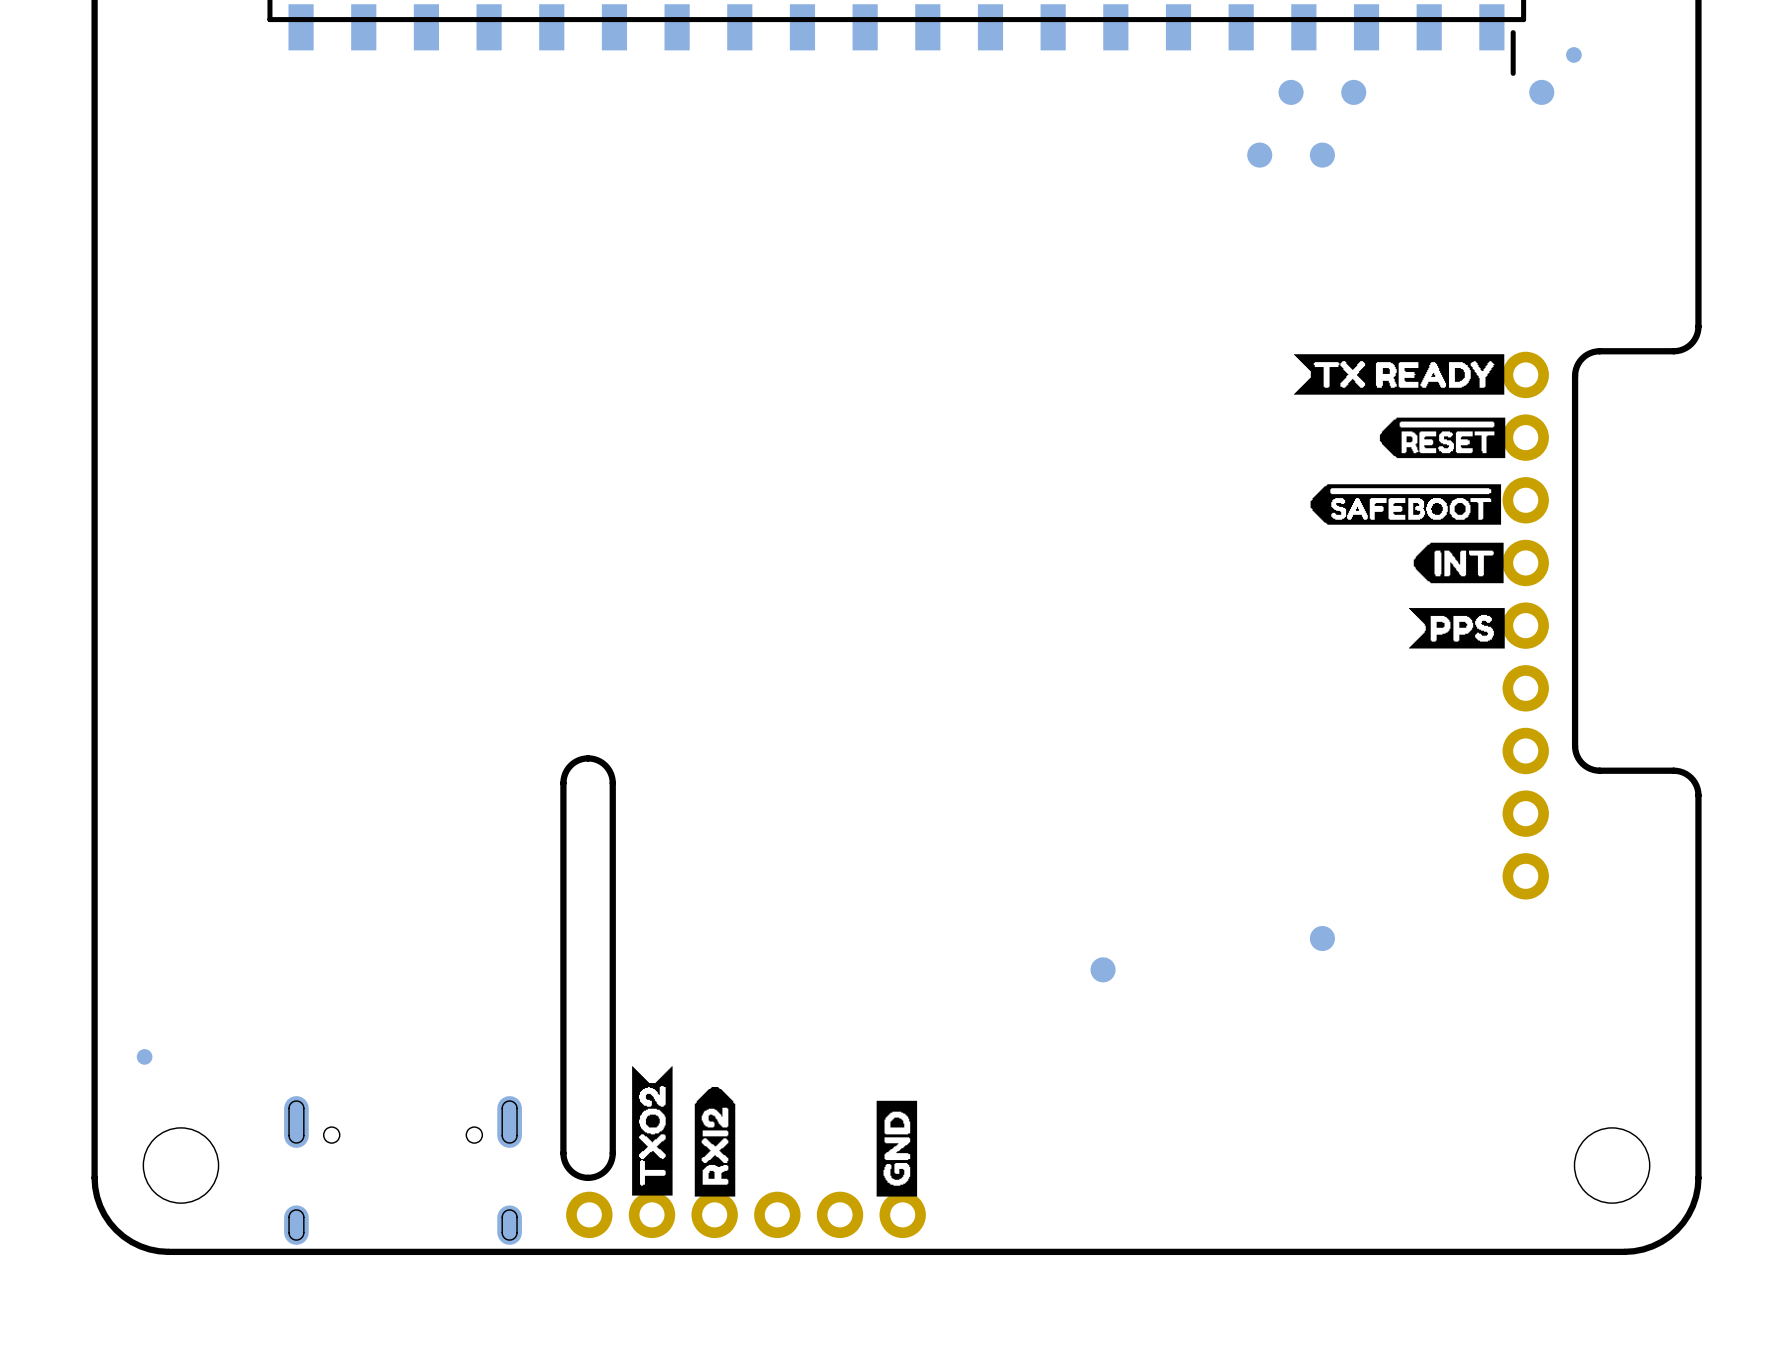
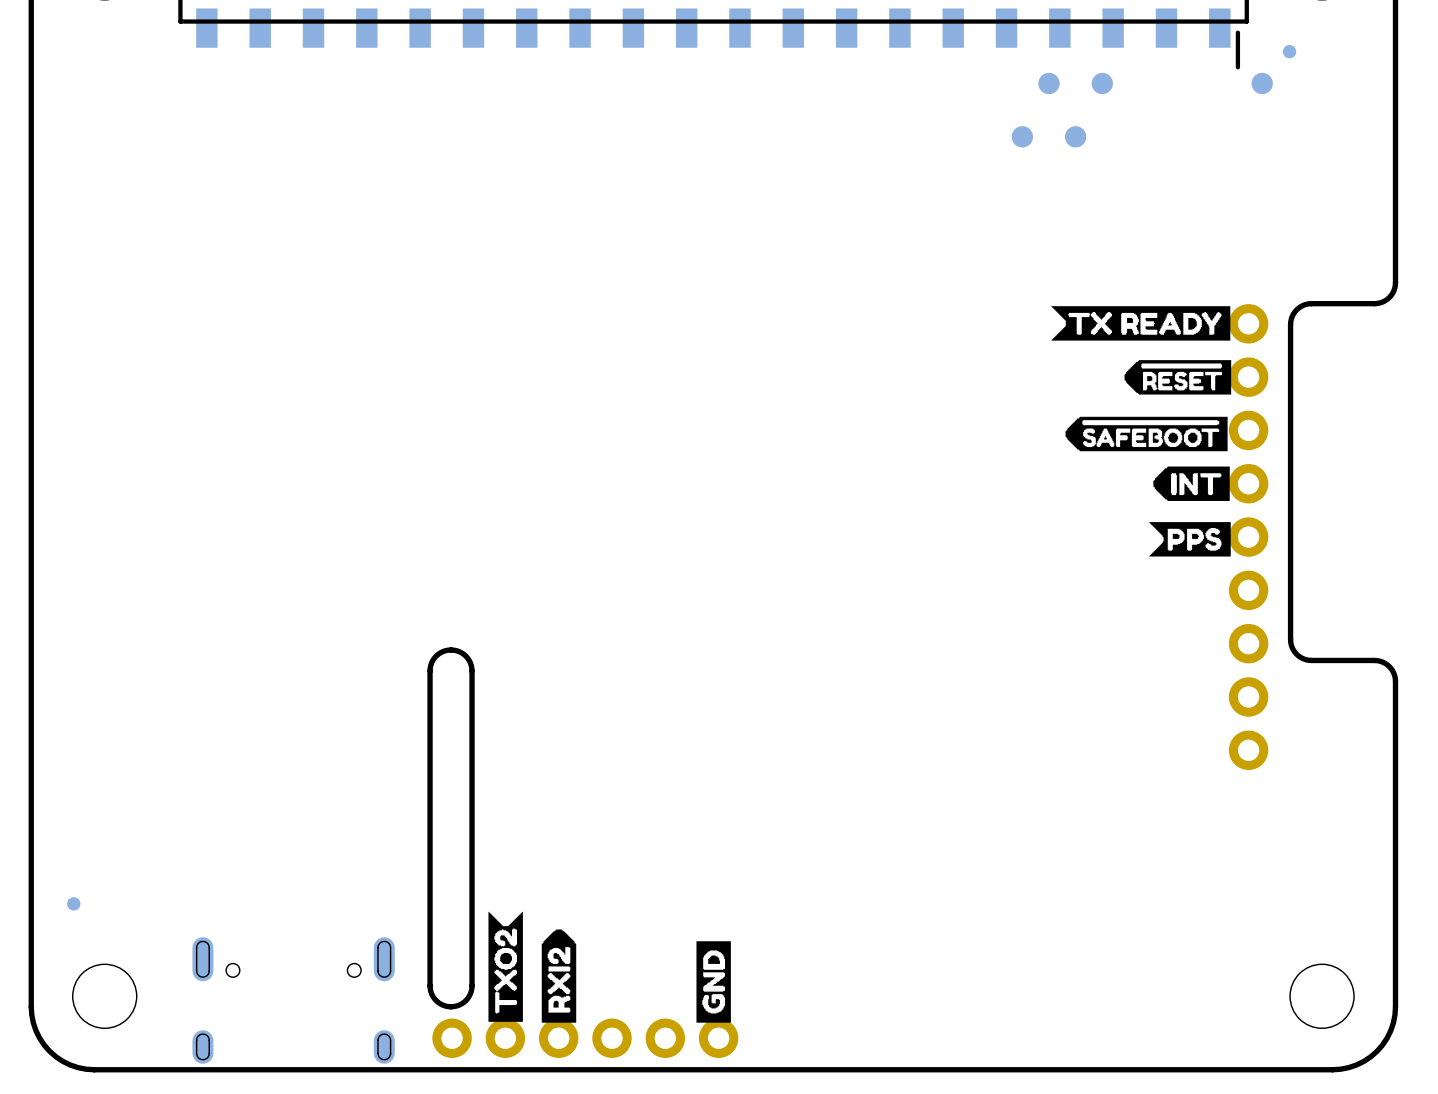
part: (1322, 938) -> none
part: (1103, 969) -> none

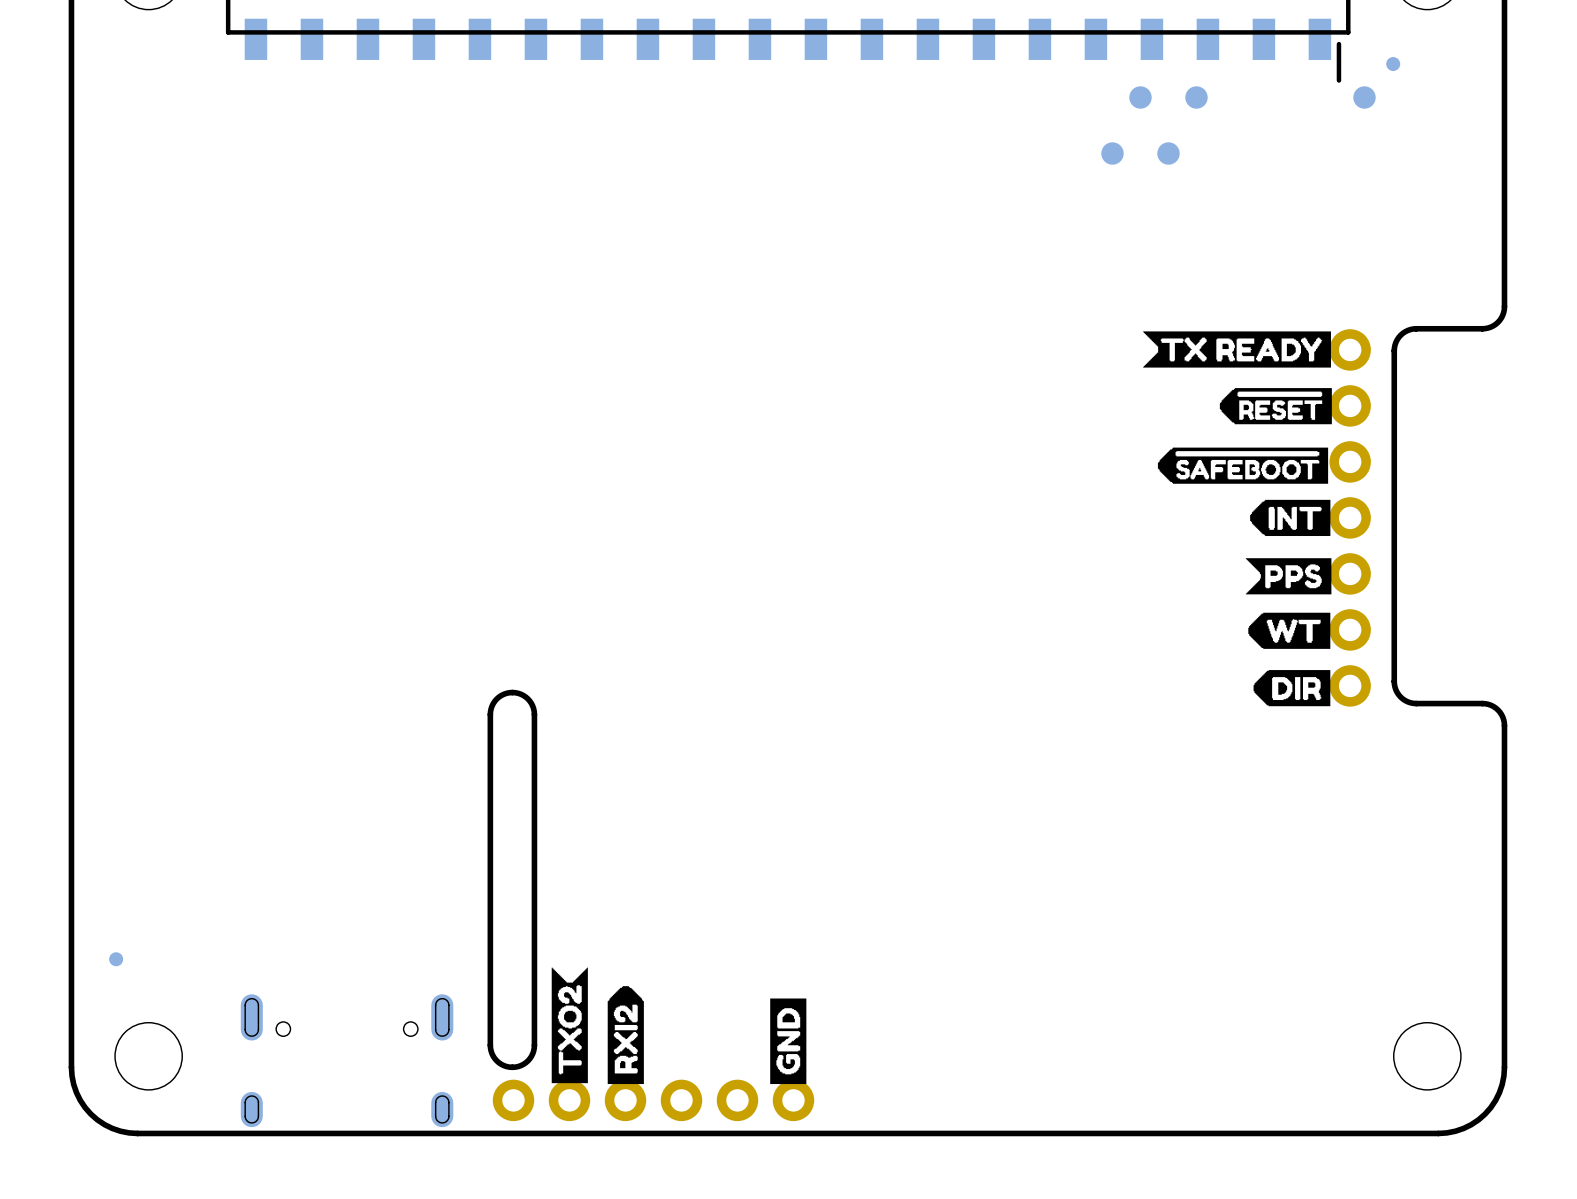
part: none -> (1350, 517)
part: (1248, 537) -> none
drawing: none -> [1248, 612, 1331, 707]

